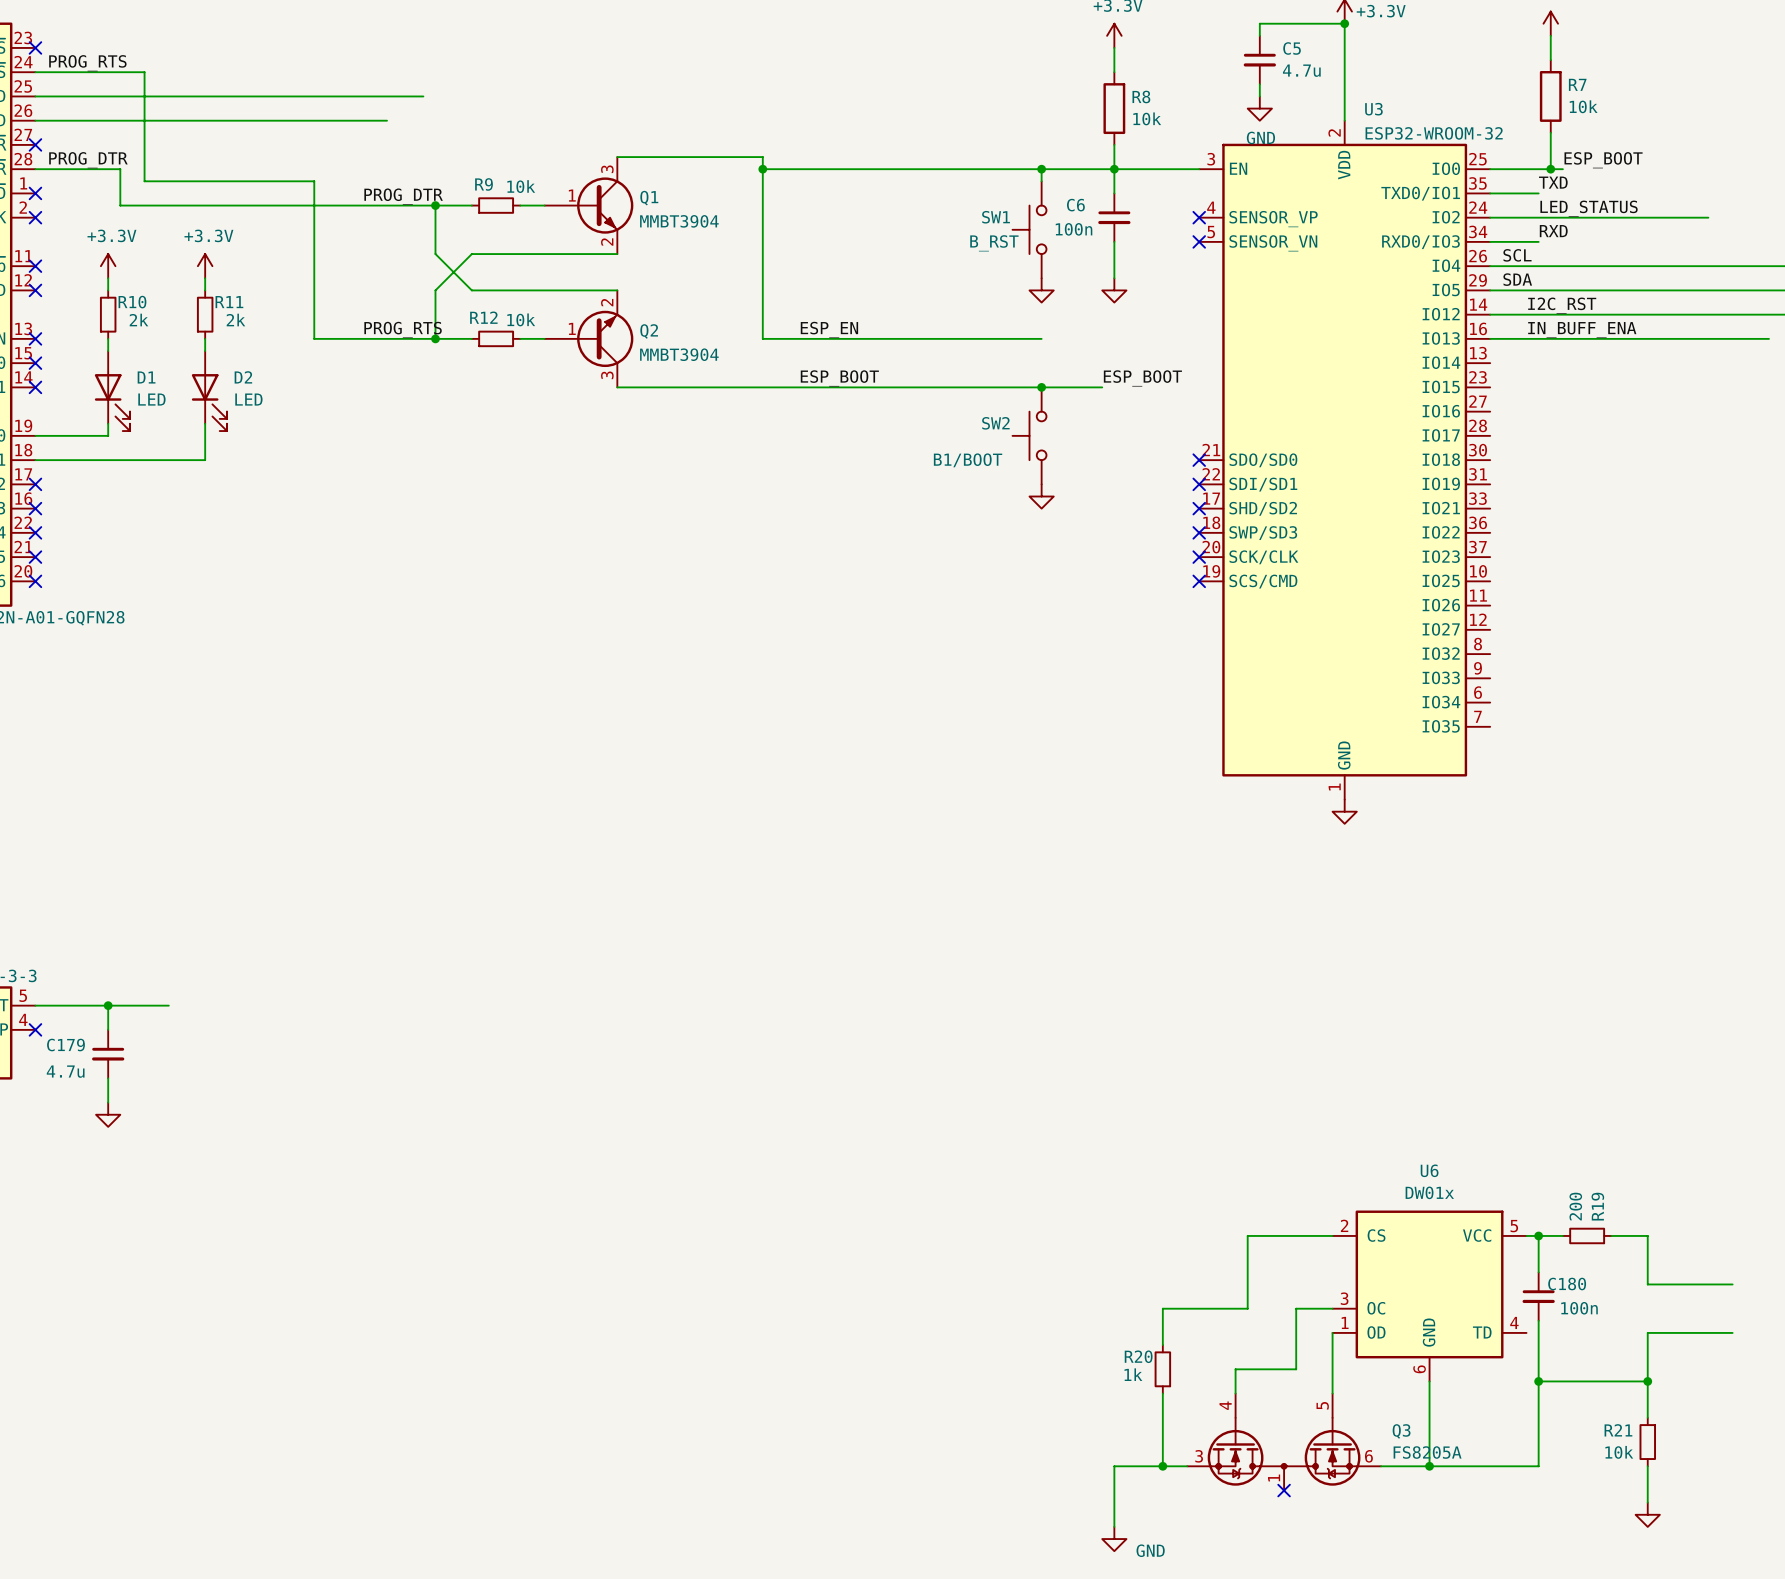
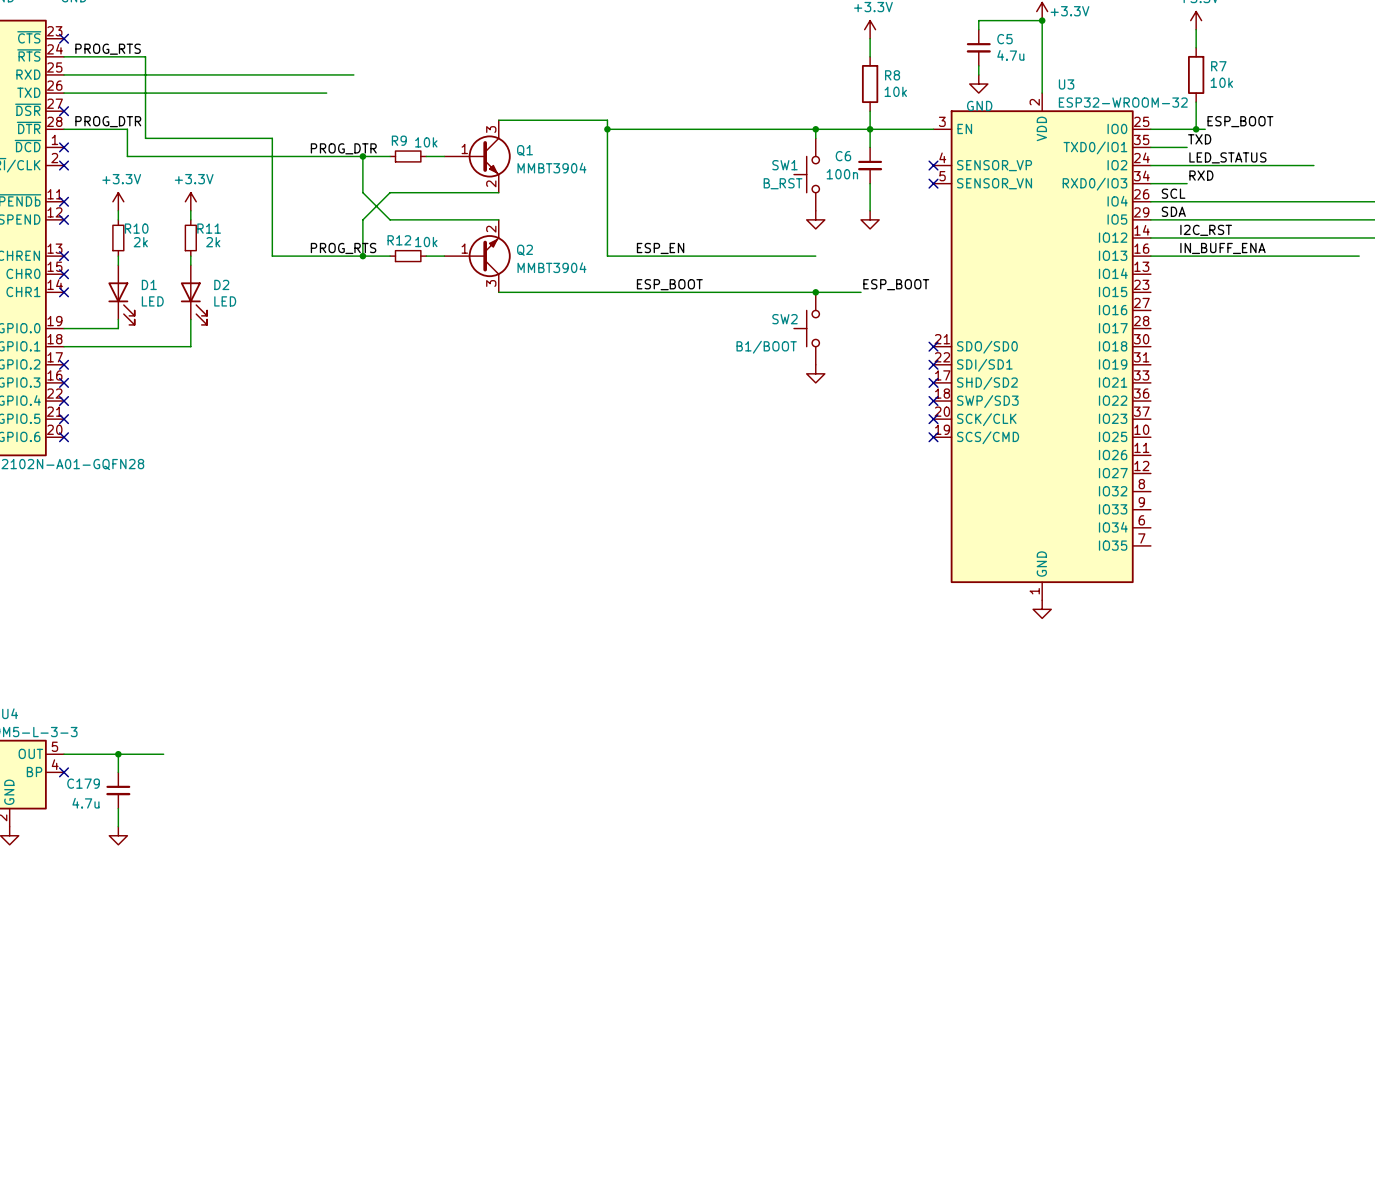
wire: (1332, 1235) (1247, 1235) (1247, 1308) (1162, 1308) (1162, 1345) -> none
wire: (1526, 1235) (1562, 1235) -> none
wire: (1538, 1235) (1538, 1272) -> none
junction: (1538, 1235) -> none
R19: 200 (1587, 1235) -> none
wire: (1611, 1235) (1647, 1235) (1647, 1284) (1732, 1284) -> none
U6: DW01x (1429, 1295) -> none
C180: 100n (1538, 1296) -> none
wire: (1332, 1308) (1296, 1308) (1296, 1369) (1235, 1369) (1235, 1393) -> none
wire: (1538, 1320) (1538, 1466) (1381, 1466) -> none
wire: (1332, 1332) (1332, 1393) -> none
wire: (1732, 1332) (1647, 1332) (1647, 1417) -> none
R20: 1k (1162, 1369) -> none
wire: (1429, 1381) (1429, 1466) -> none
wire: (1538, 1381) (1647, 1381) -> none
junction: (1538, 1381) -> none
junction: (1647, 1381) -> none
wire: (1162, 1393) (1162, 1466) -> none
Q3: FS8205A (1284, 1442) -> none
R21: 10k (1647, 1442) -> none
junction: (1162, 1466) -> none
wire: (1187, 1466) (1114, 1466) (1114, 1526) -> none
junction: (1429, 1466) -> none
wire: (1647, 1466) (1647, 1502) -> none
no-connect mark: (1284, 1490) -> none
power symbol: (1647, 1514) -> none
power symbol: GND (1114, 1539) -> none

